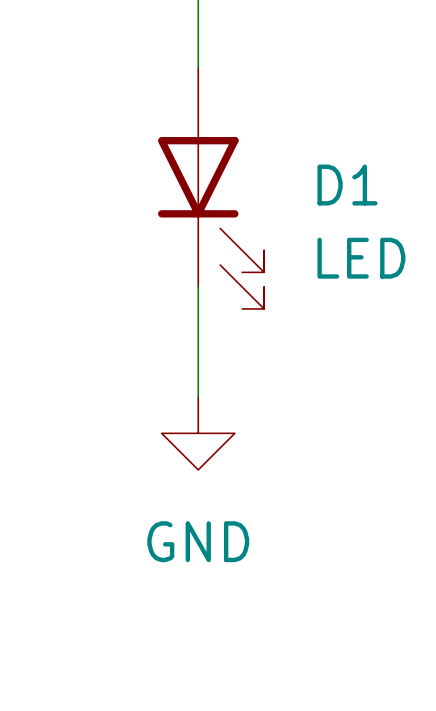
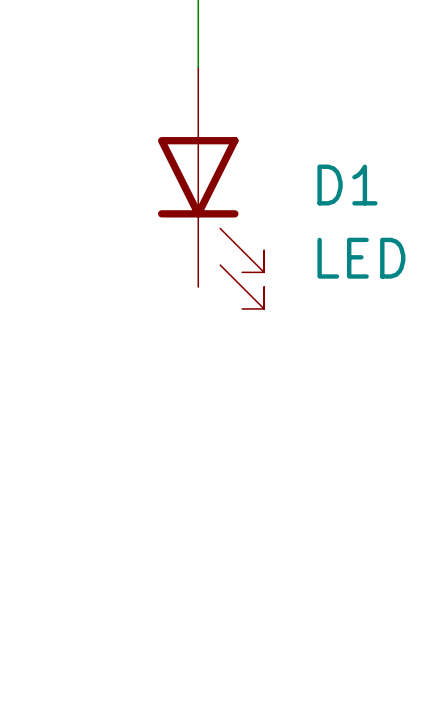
wire: (198, 287) (198, 396) -> none
power symbol: GND (198, 433) -> none

